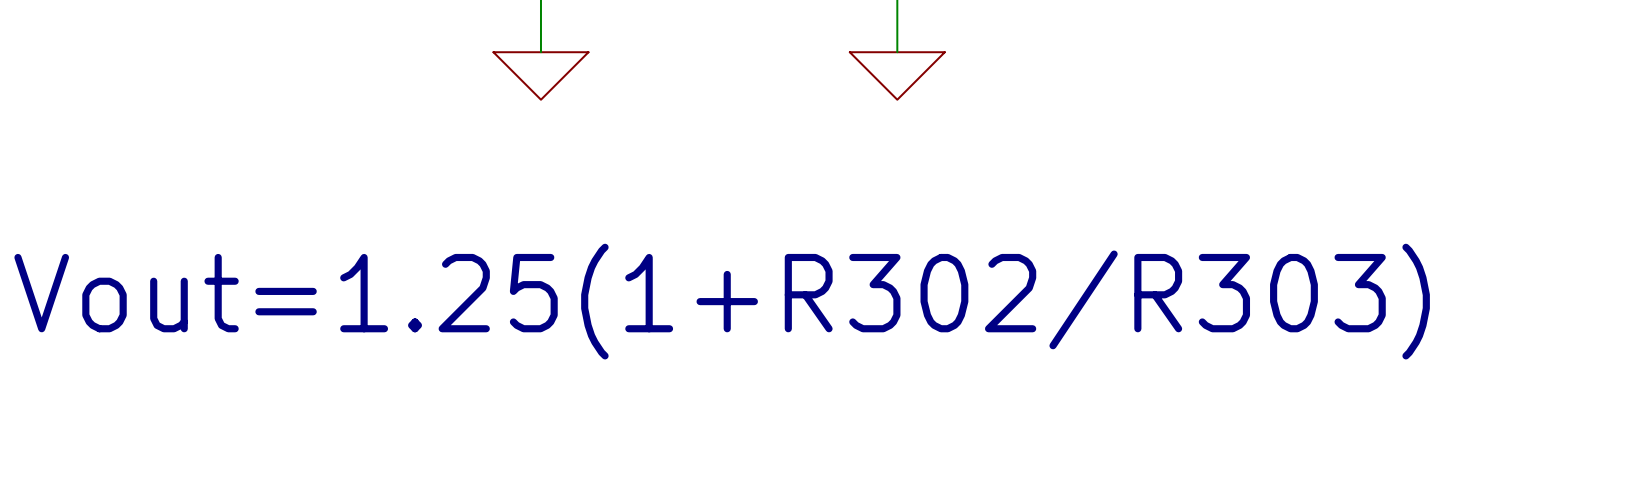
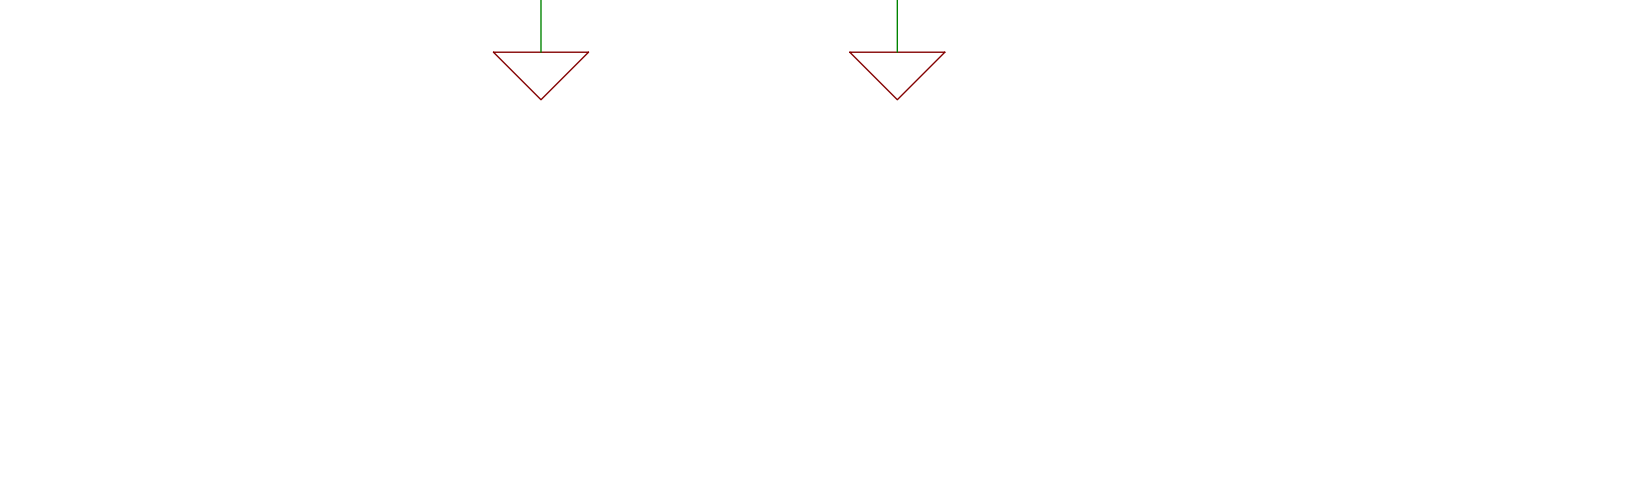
text: Vout=1.25(1+R302/R303) (722, 301) -> none

